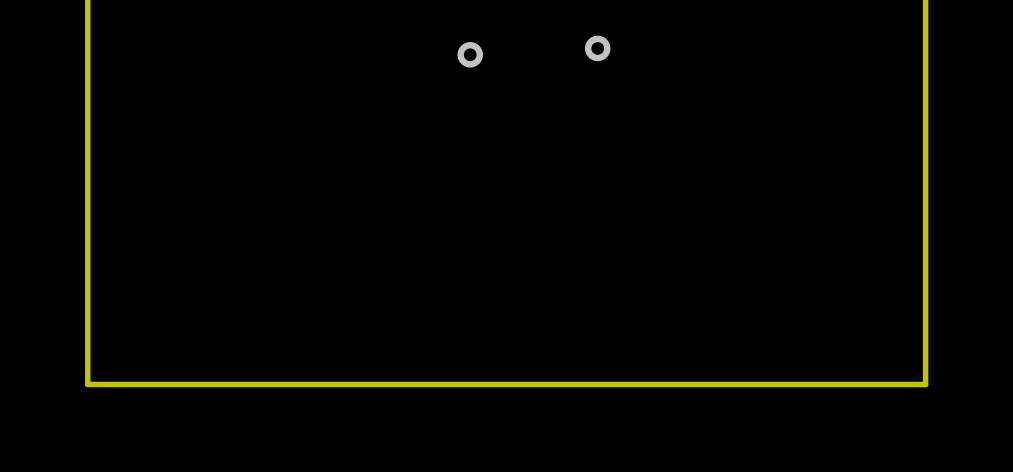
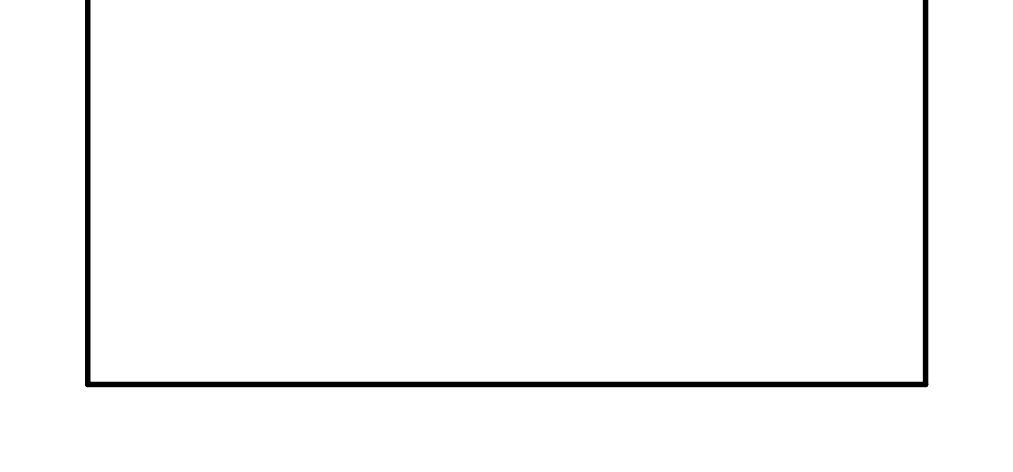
via: (597, 48) -> none
via: (470, 54) -> none

